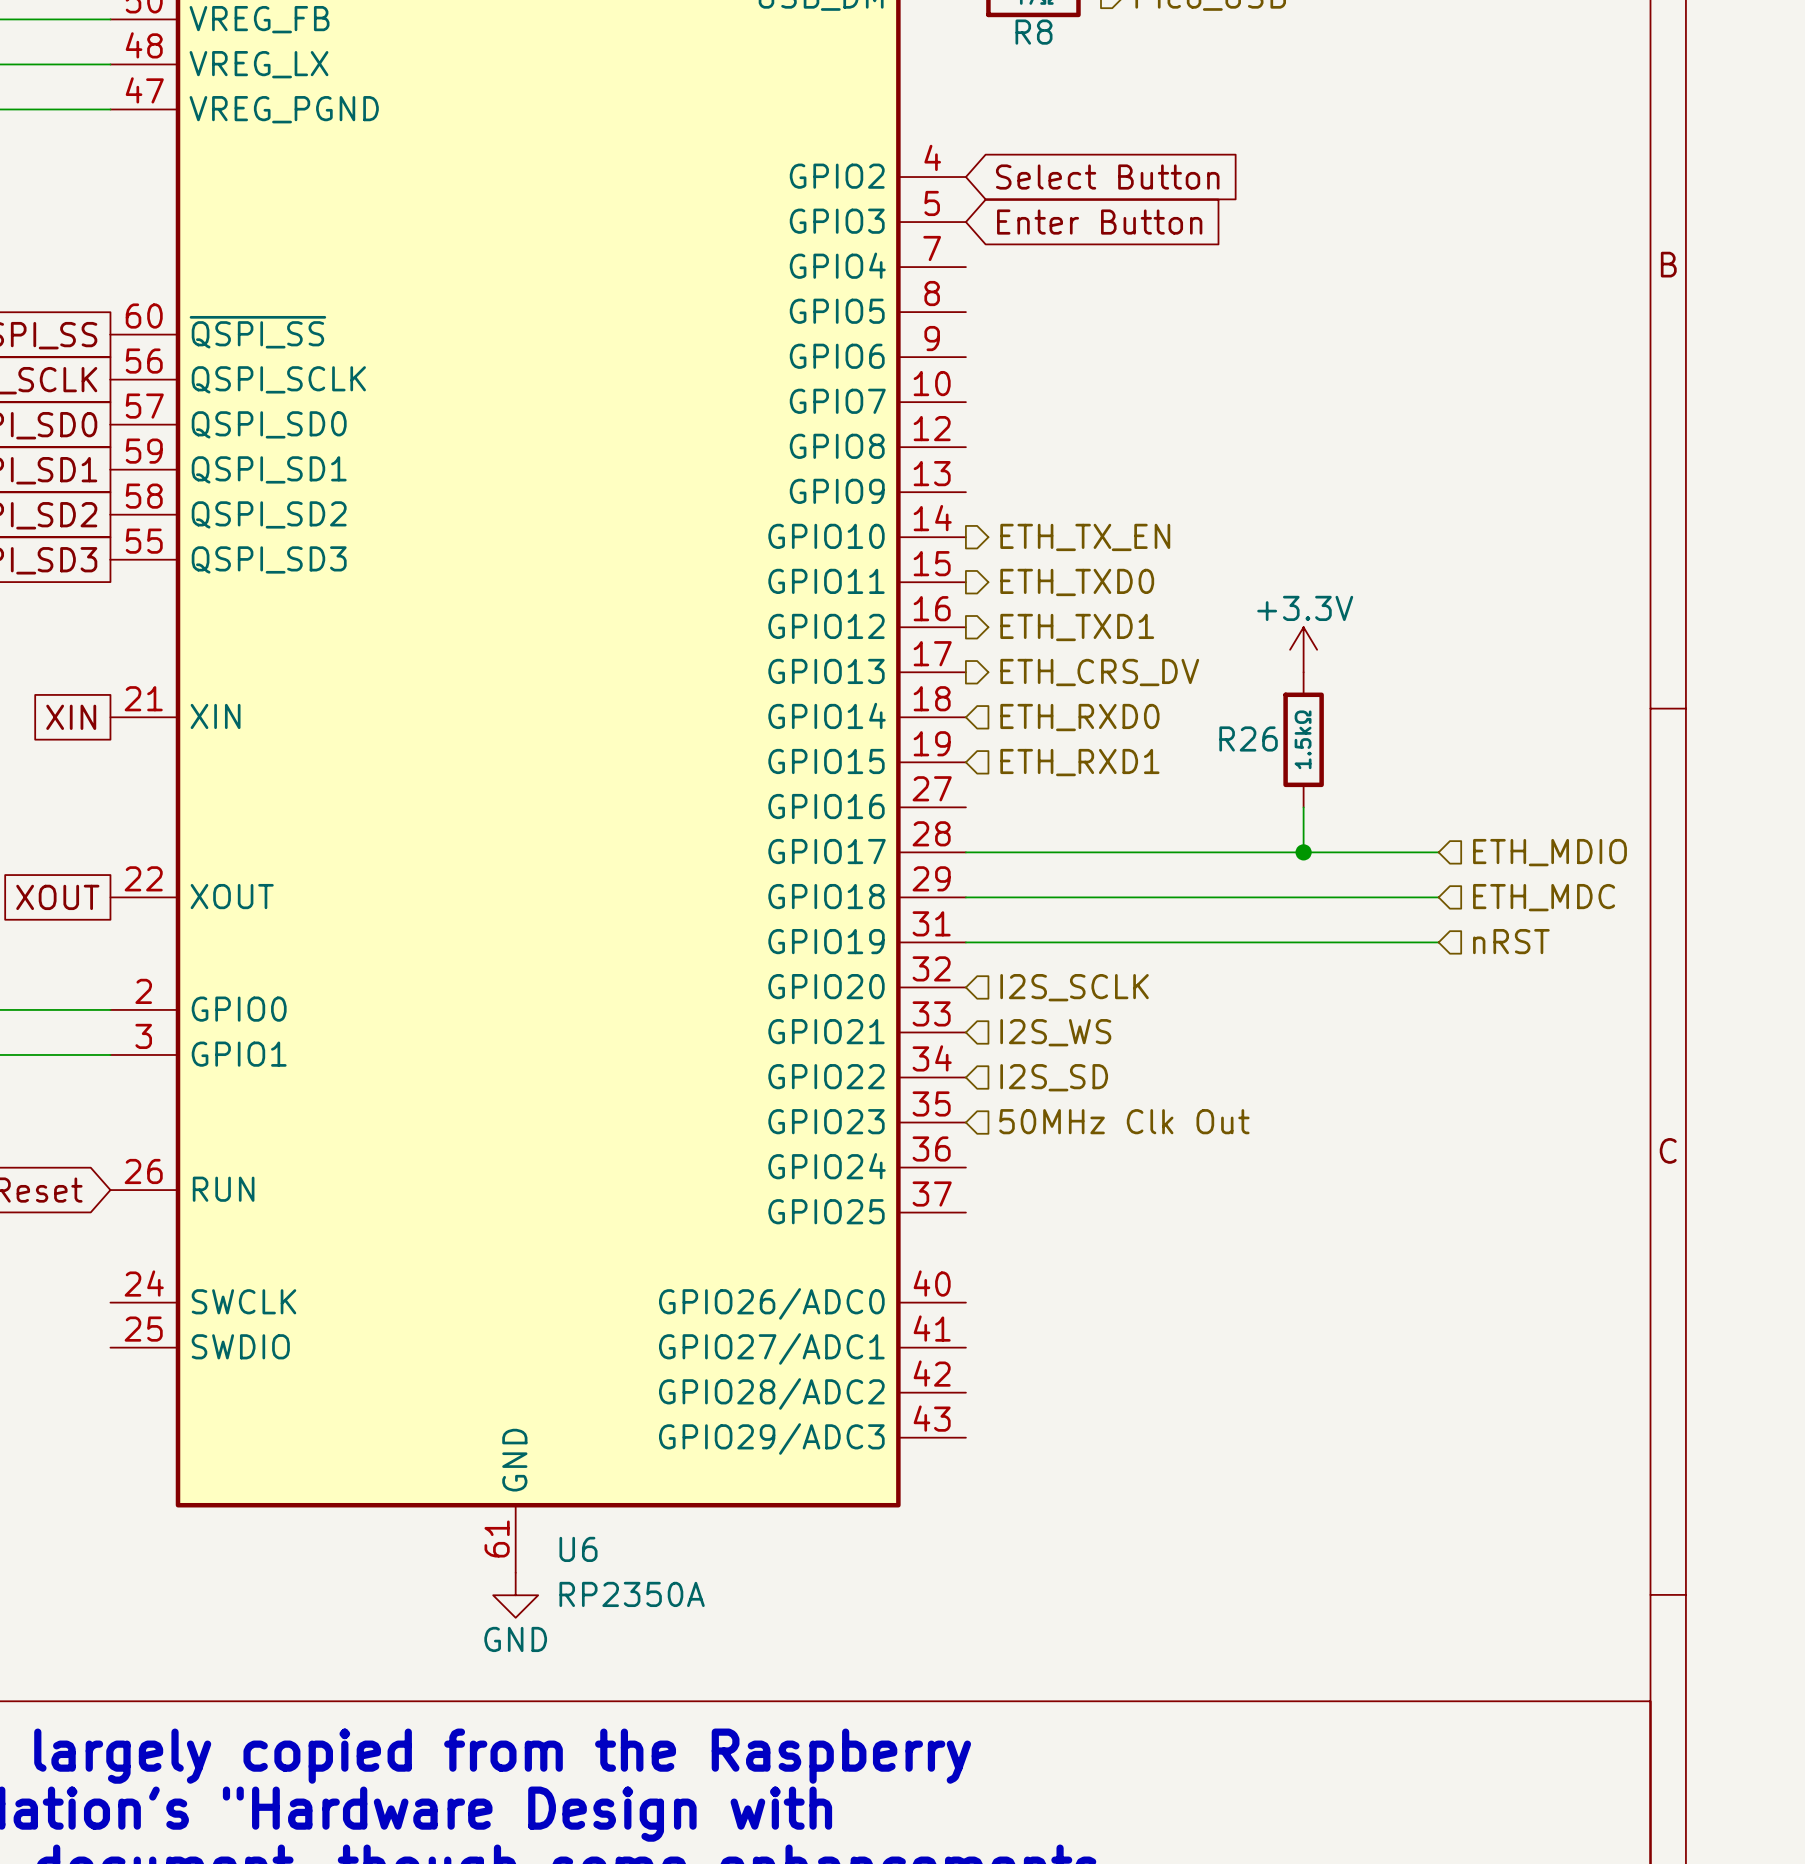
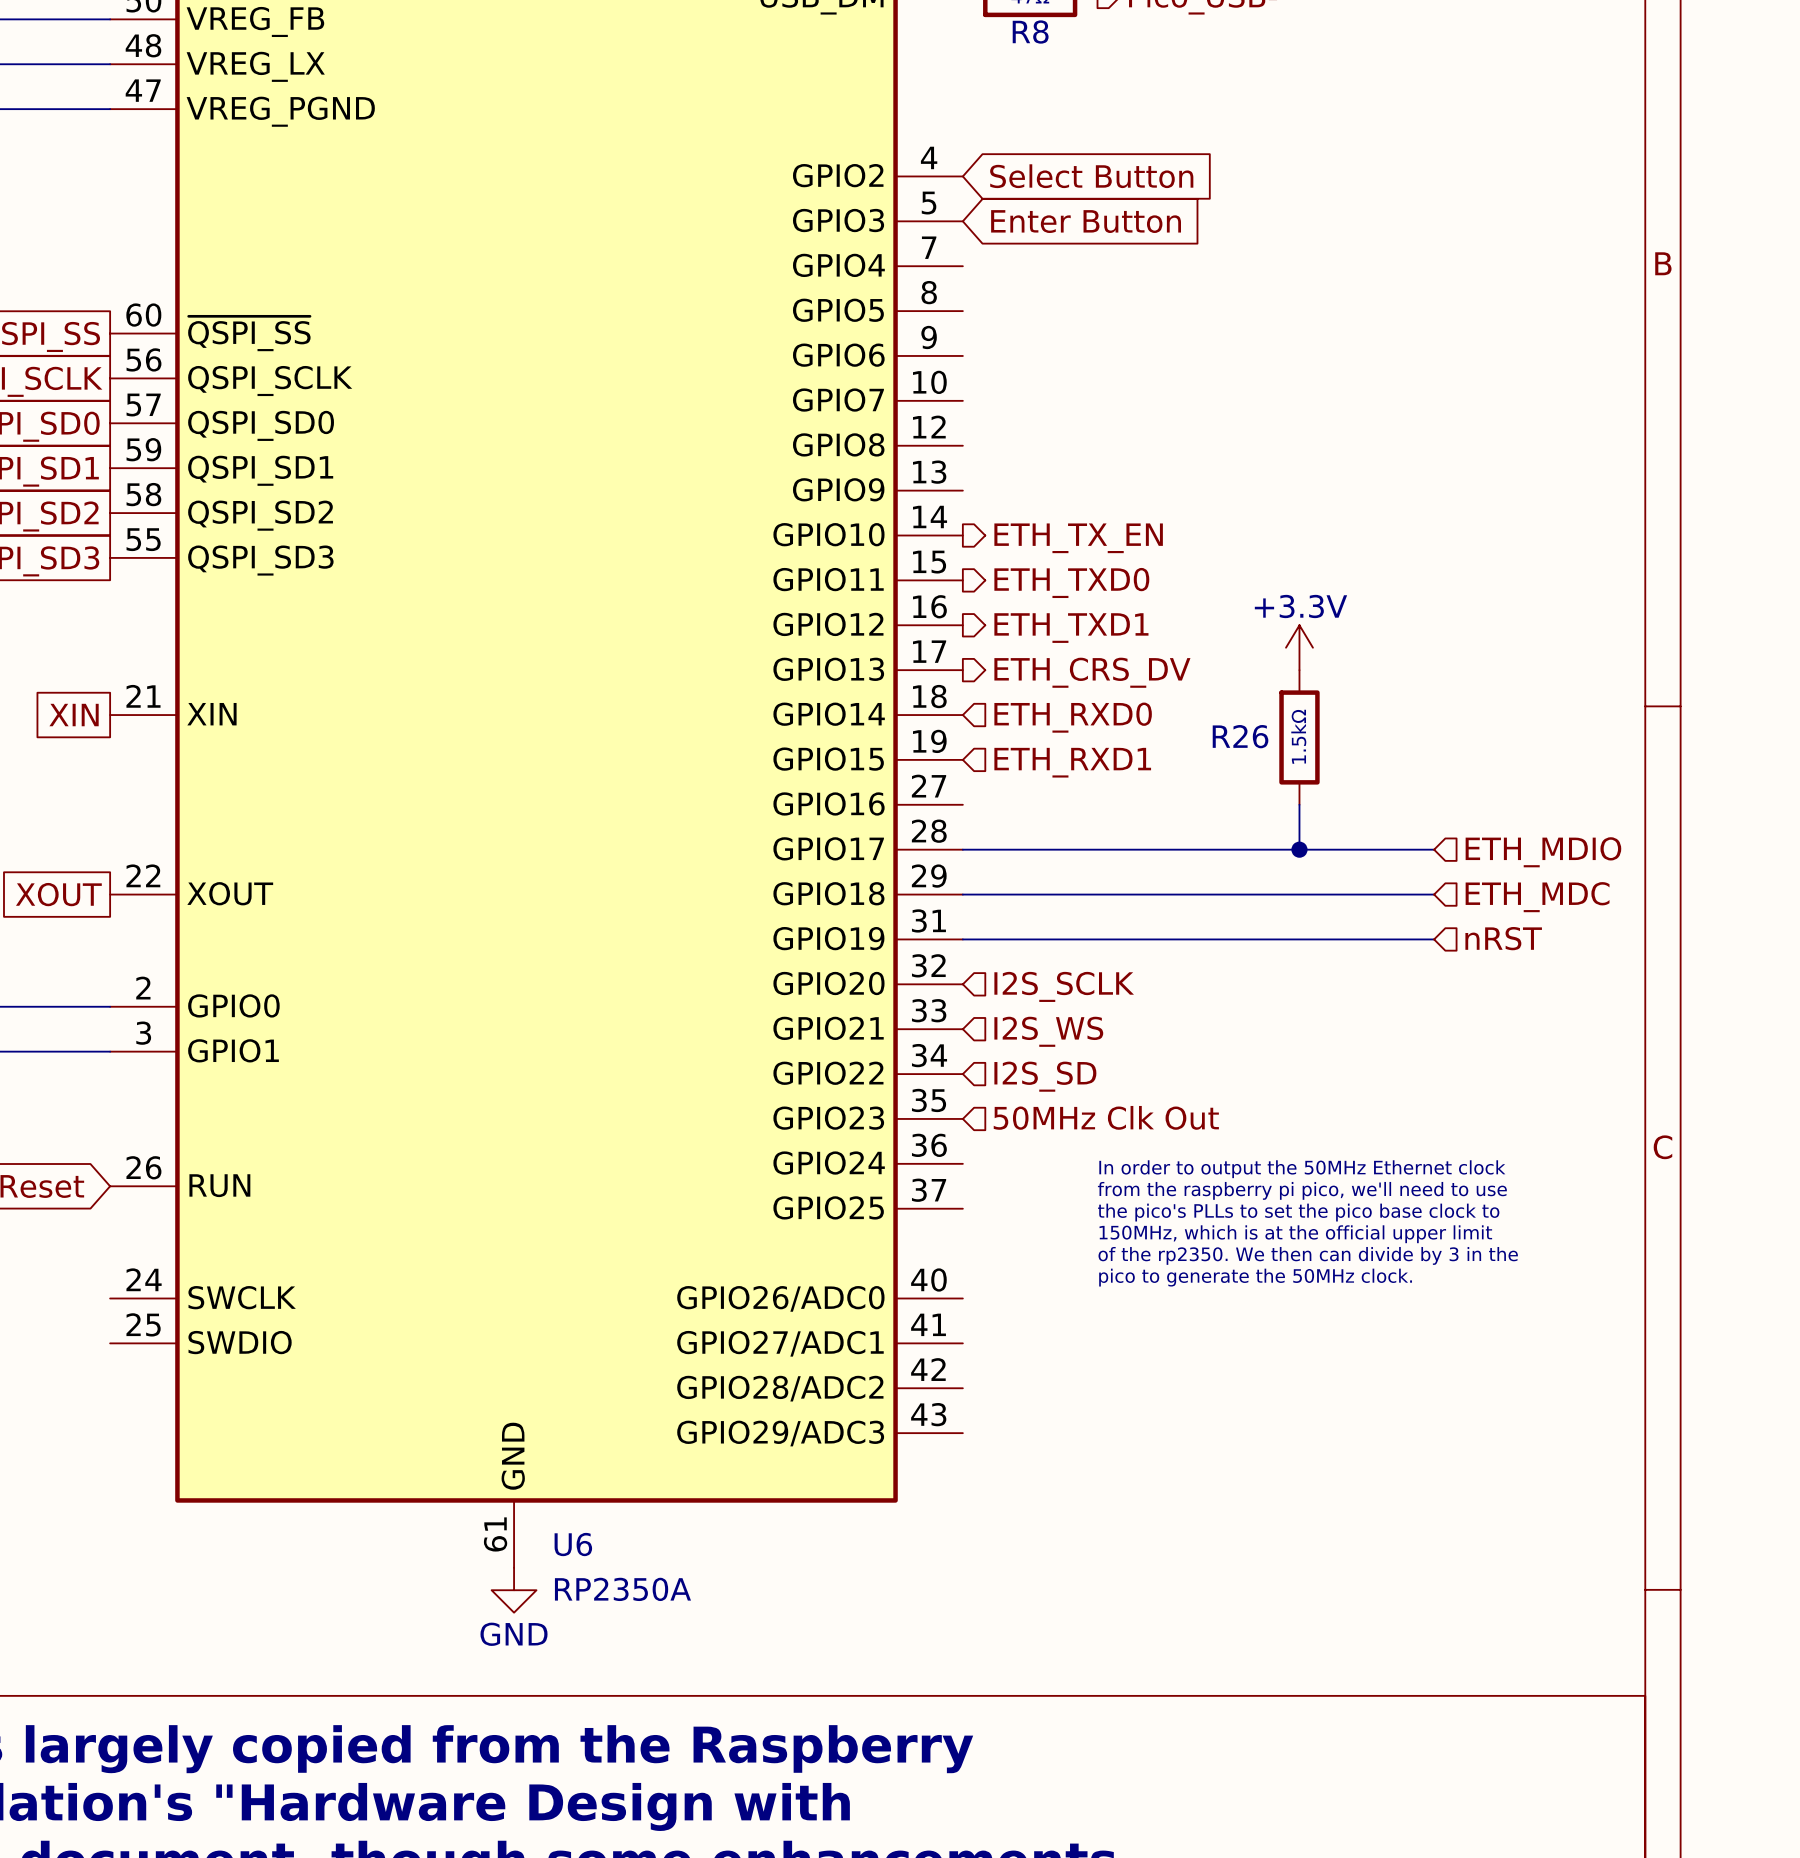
text: none -> In order to output the 50MHz Ethernet clock (1302, 1169)
text: none -> from the raspberry pi pico, we'll need to use (1302, 1190)
text: none -> the pico's PLLs to set the pico base clock to (1298, 1212)
text: none -> 150MHz, which is at the official upper limit (1295, 1234)
text: none -> of the rp2350. We then can divide by 3 in the (1308, 1255)
text: none -> pico to generate the 50MHz clock. (1255, 1277)

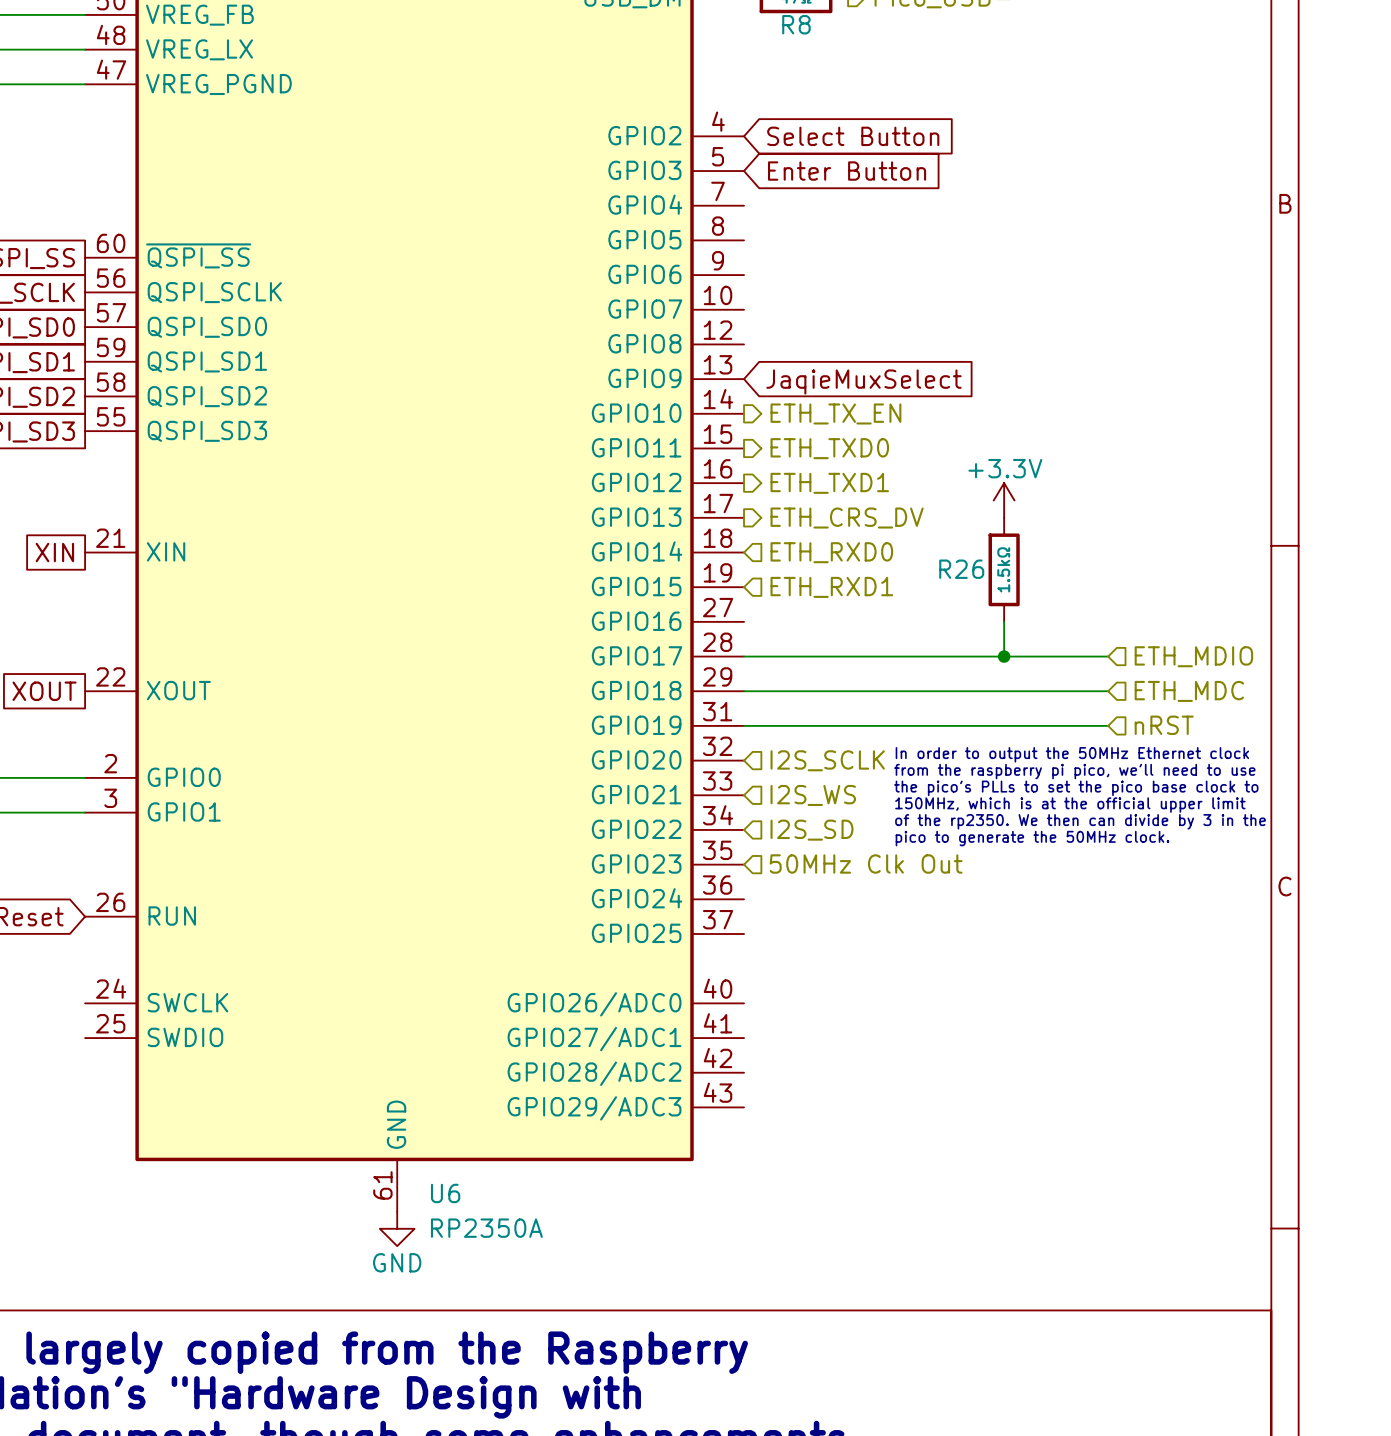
global label: none -> JaqieMuxSelect (863, 382)
text position: In order to output the 50MHz Ethernet clock (1302, 1169) -> In order to output the 50MHz Ethernet clock (1072, 754)
text position: from the raspberry pi pico, we'll need to use (1302, 1190) -> from the raspberry pi pico, we'll need to use (1074, 771)
text position: the pico's PLLs to set the pico base clock to (1298, 1212) -> the pico's PLLs to set the pico base clock to (1076, 788)
text position: 150MHz, which is at the official upper limit (1295, 1234) -> 150MHz, which is at the official upper limit (1070, 805)
text position: of the rp2350. We then can divide by 3 in the (1308, 1255) -> of the rp2350. We then can divide by 3 in the (1080, 821)
text position: pico to generate the 50MHz clock. (1255, 1277) -> pico to generate the 50MHz clock. (1032, 838)

